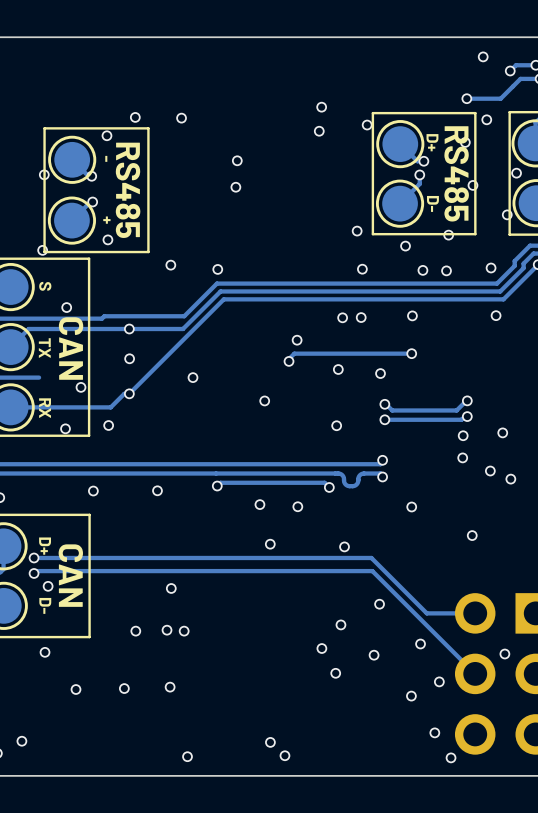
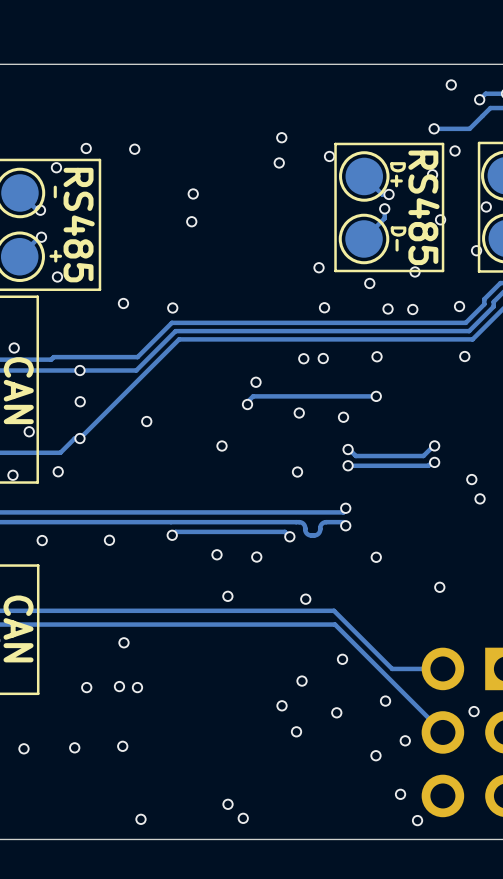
via: (463, 435) -> none
via: none -> (480, 498)
via: (462, 457) -> none
via: (490, 471) -> none
via: (510, 479) -> none

